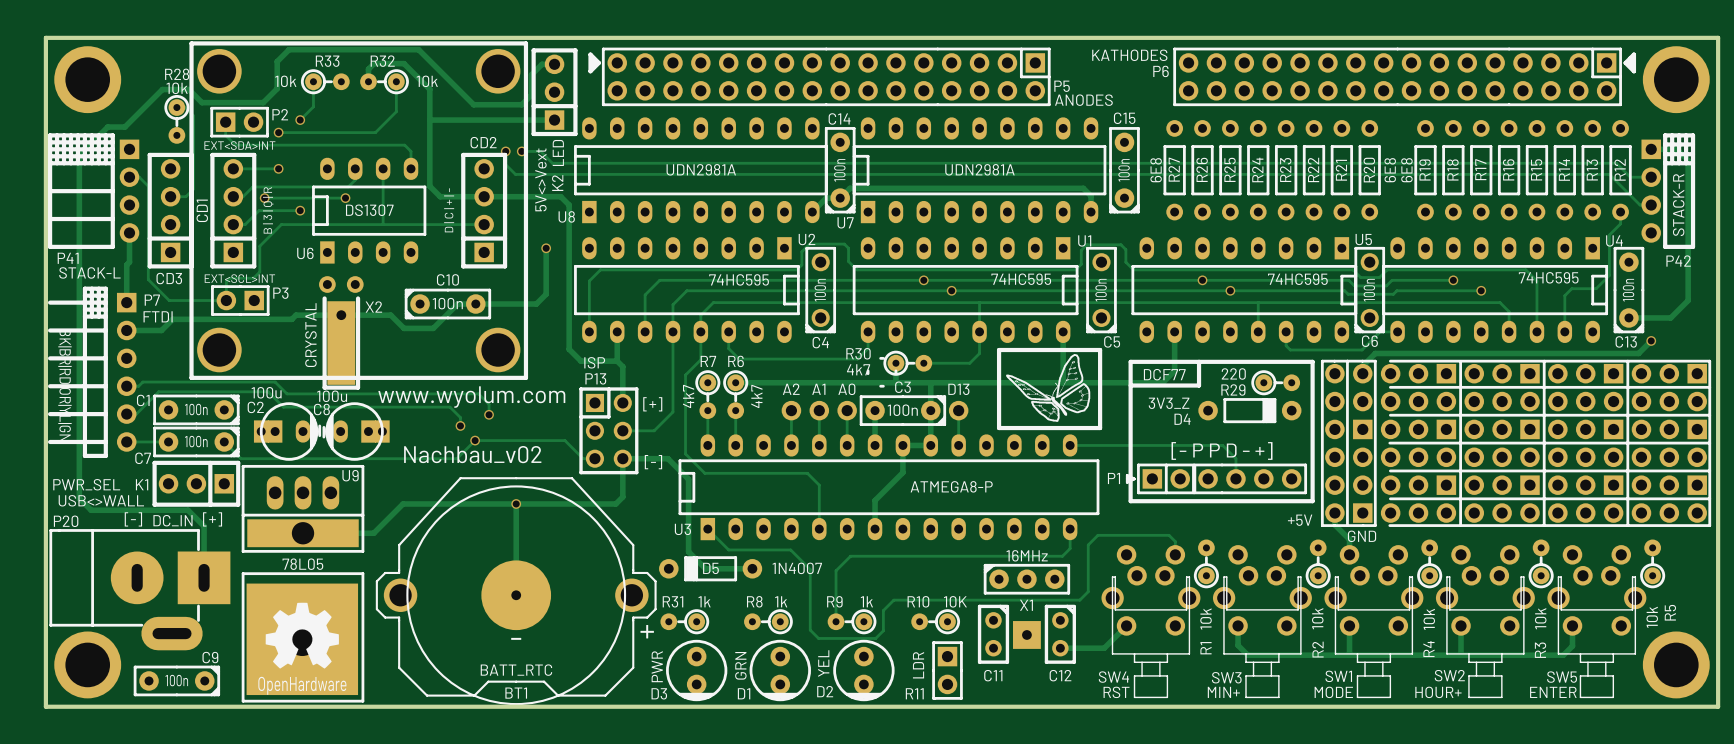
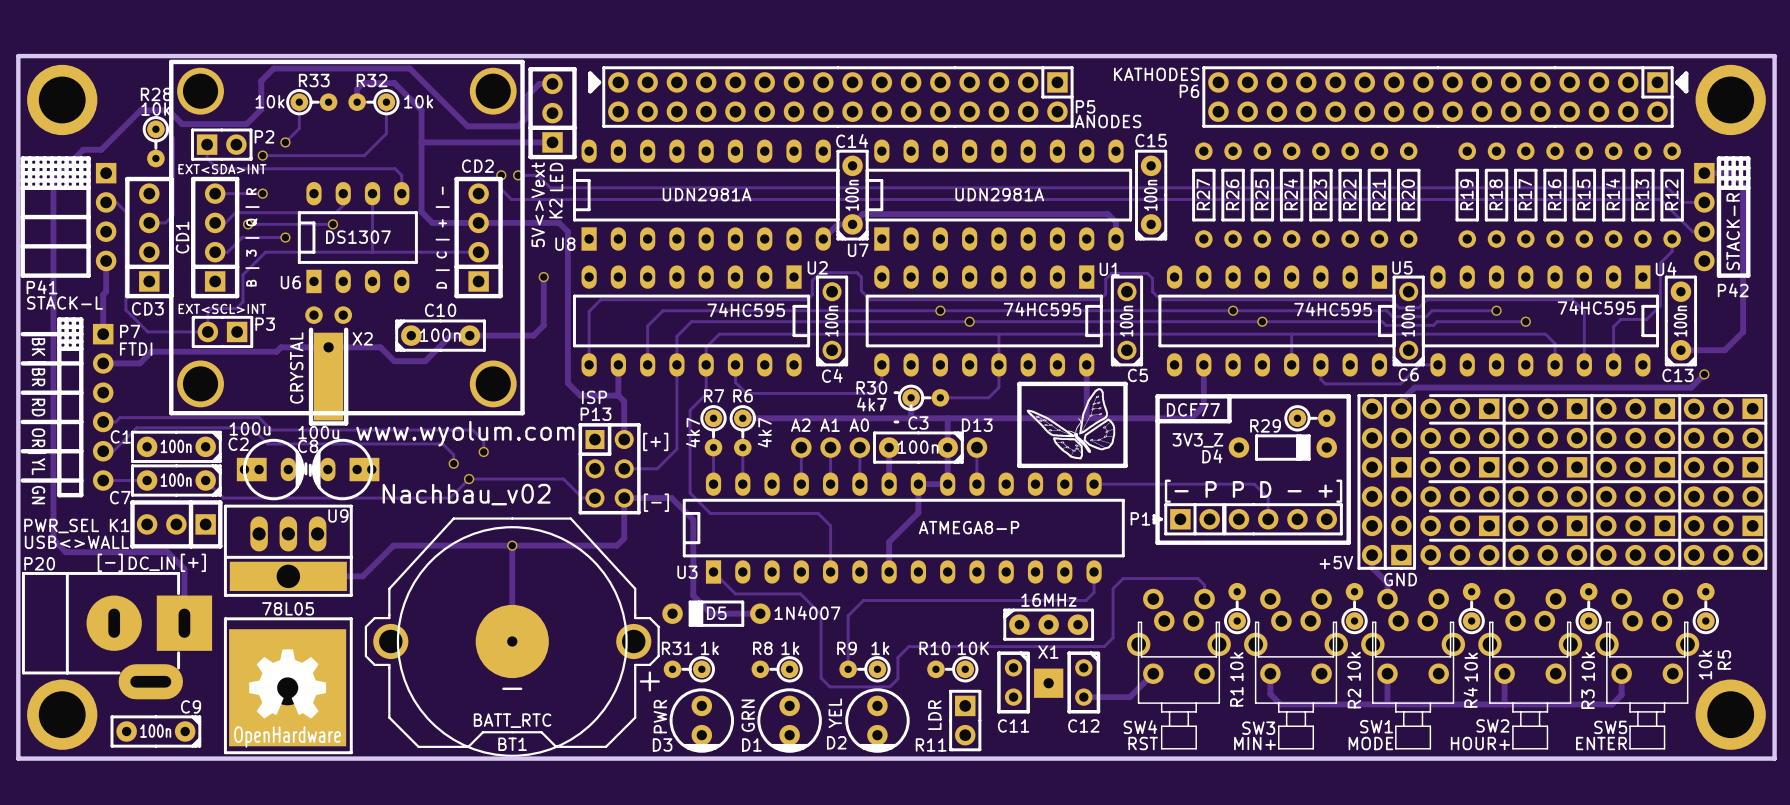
R27 value: 6E8 (1156, 170) -> none
R20 value: 6E8 (1390, 170) -> none
R19 value: 6E8 (1406, 170) -> none
R29 value: 220 (1233, 373) -> none

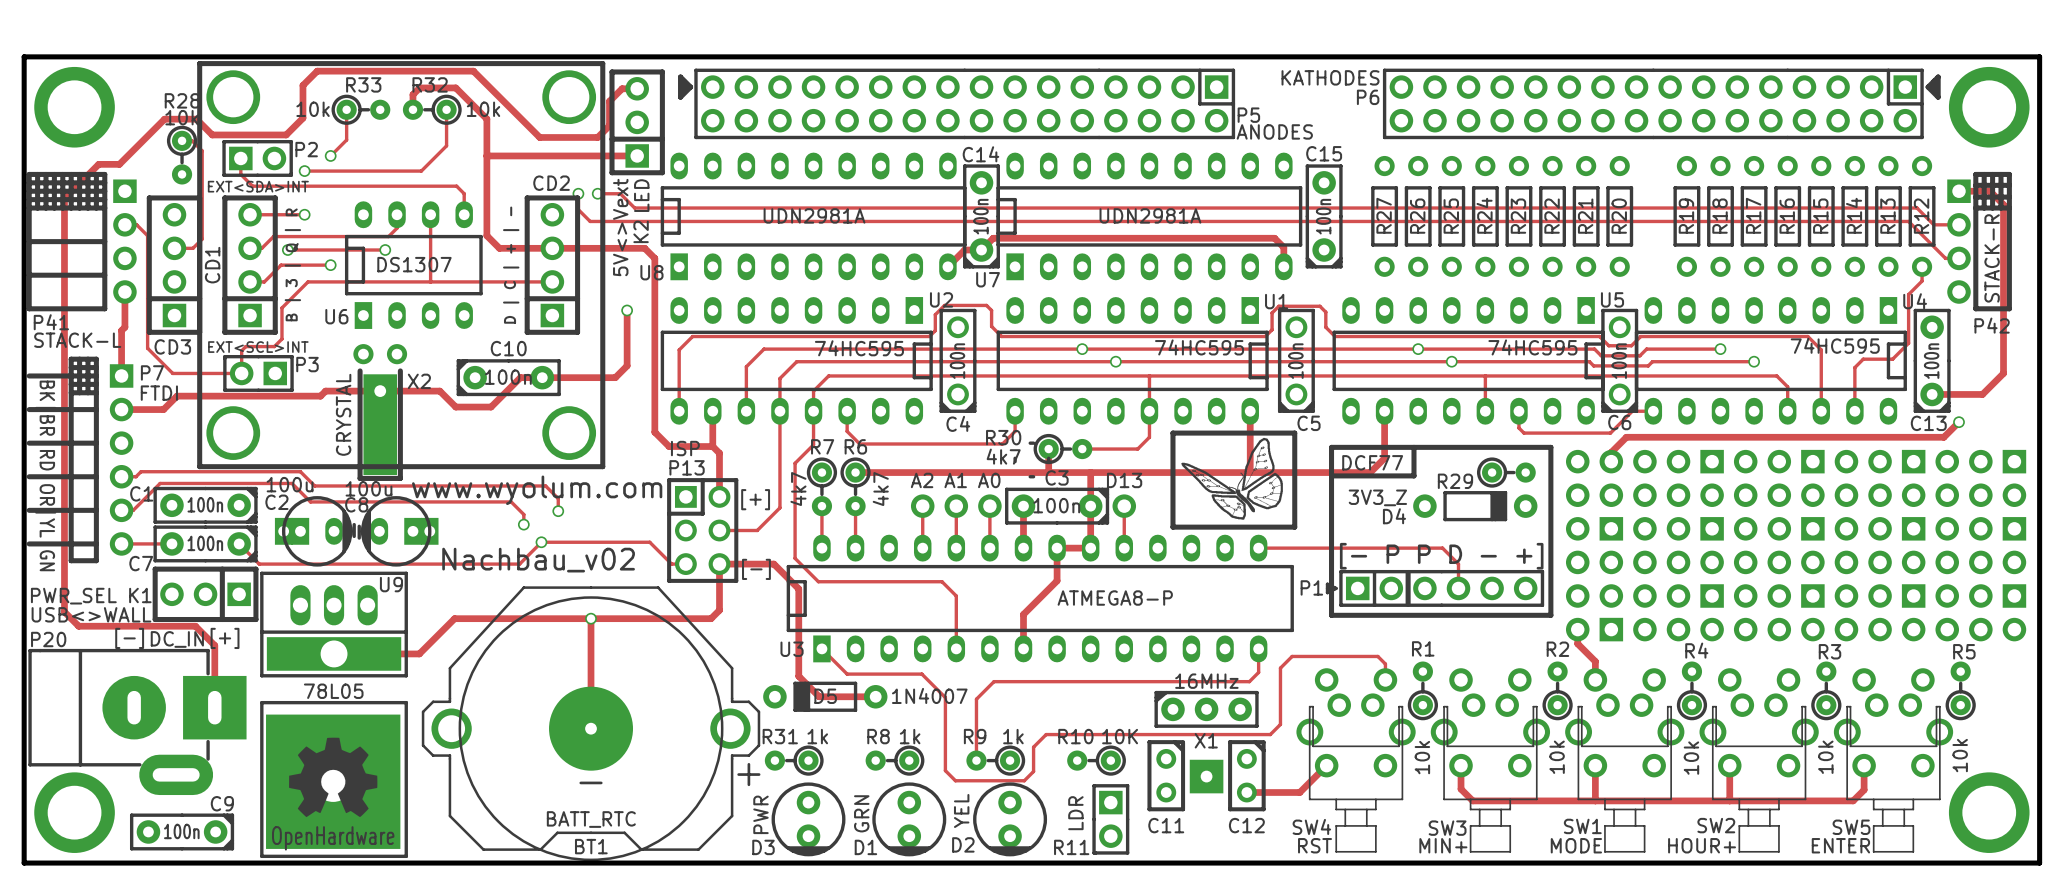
line: (1358, 395) (1414, 395) (1414, 568) (1358, 568) (1358, 395) -> none
line: (1385, 395) (1385, 568) -> none
line: (1430, 395) (1765, 395) (1765, 568) (1429, 568) -> none
line: (1591, 395) (1591, 568) -> none
line: (1679, 395) (1679, 568) -> none
line: (1504, 396) (1504, 568) -> none
line: (1430, 423) (1765, 423) -> none
line: (1430, 452) (1765, 452) -> none
line: (1429, 481) (1765, 481) -> none
line: (1430, 510) (1765, 510) -> none
line: (1430, 540) (1765, 540) -> none
text: +5V (1336, 562) -> none
text: GND (1400, 579) -> none
R5 name rotation: 0° (1724, 659) -> 90° clockwise (1964, 651)
R5 name position: R5 (1724, 659) -> R5 (1964, 651)
R1 name rotation: 0° (1236, 696) -> 90° clockwise (1423, 648)
R1 name position: R1 (1236, 696) -> R1 (1423, 648)
R4 name rotation: 0° (1470, 697) -> 90° clockwise (1696, 650)
R4 name position: R4 (1470, 697) -> R4 (1696, 650)
R2 name rotation: 0° (1354, 698) -> 90° clockwise (1557, 649)
R2 name position: R2 (1354, 698) -> R2 (1557, 649)
R3 name rotation: 0° (1588, 699) -> 90° clockwise (1830, 651)
R3 name position: R3 (1588, 699) -> R3 (1830, 651)

